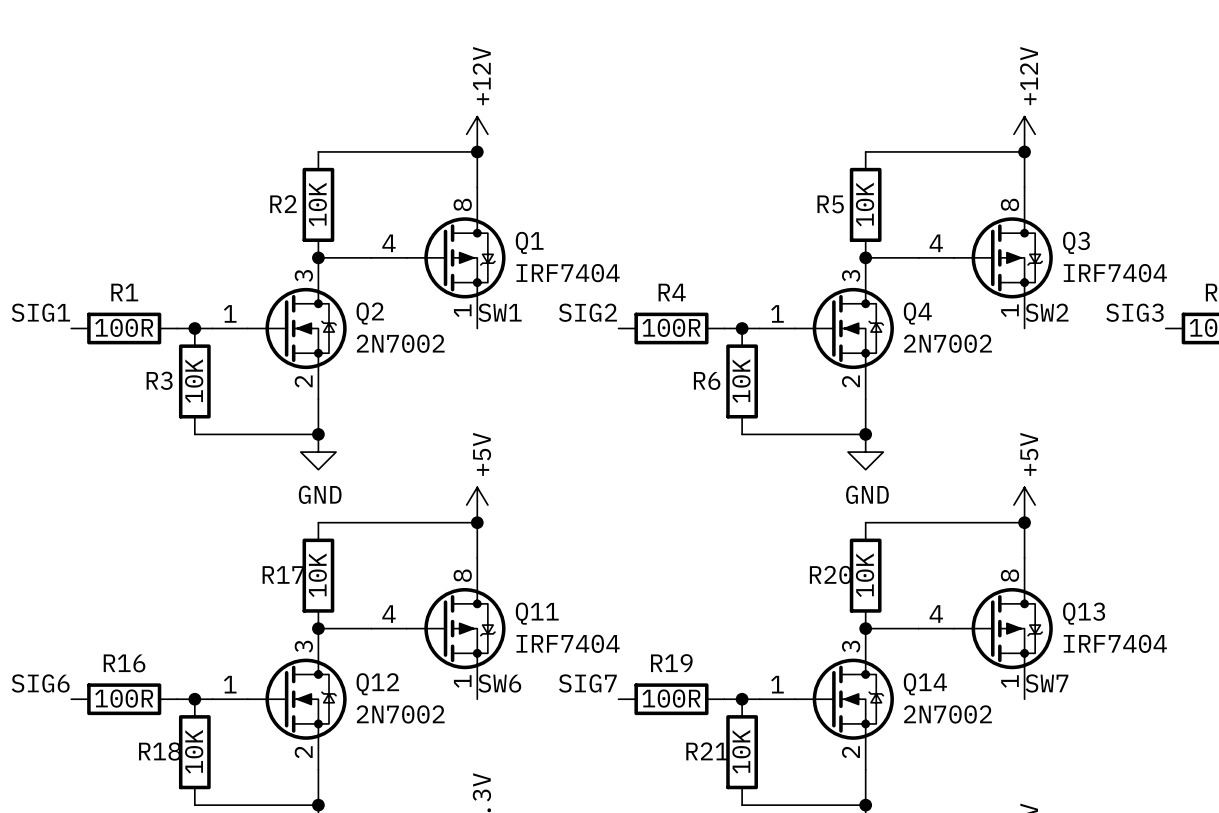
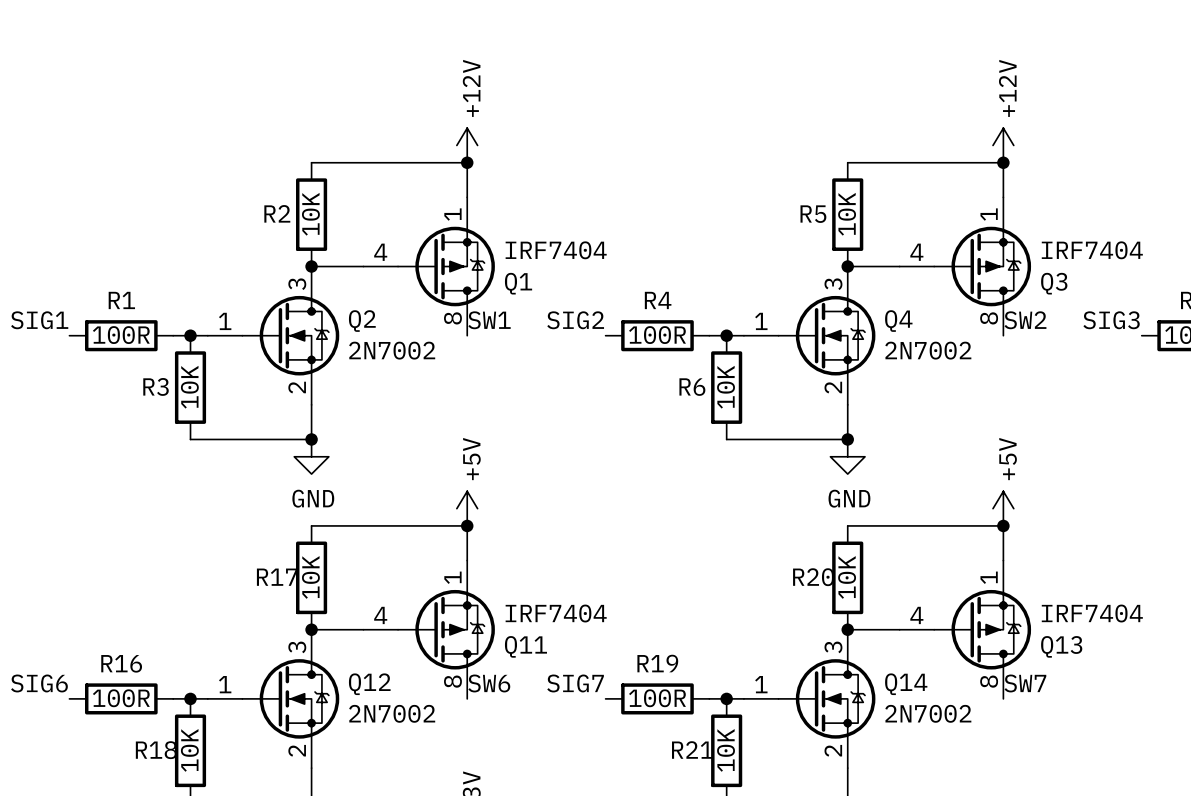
Q1 flip: as is (456, 257) -> up-down (446, 266)
Q3 flip: as is (1003, 257) -> up-down (982, 266)
Q11 flip: as is (456, 628) -> up-down (446, 629)
Q13 flip: as is (1003, 628) -> up-down (982, 629)

